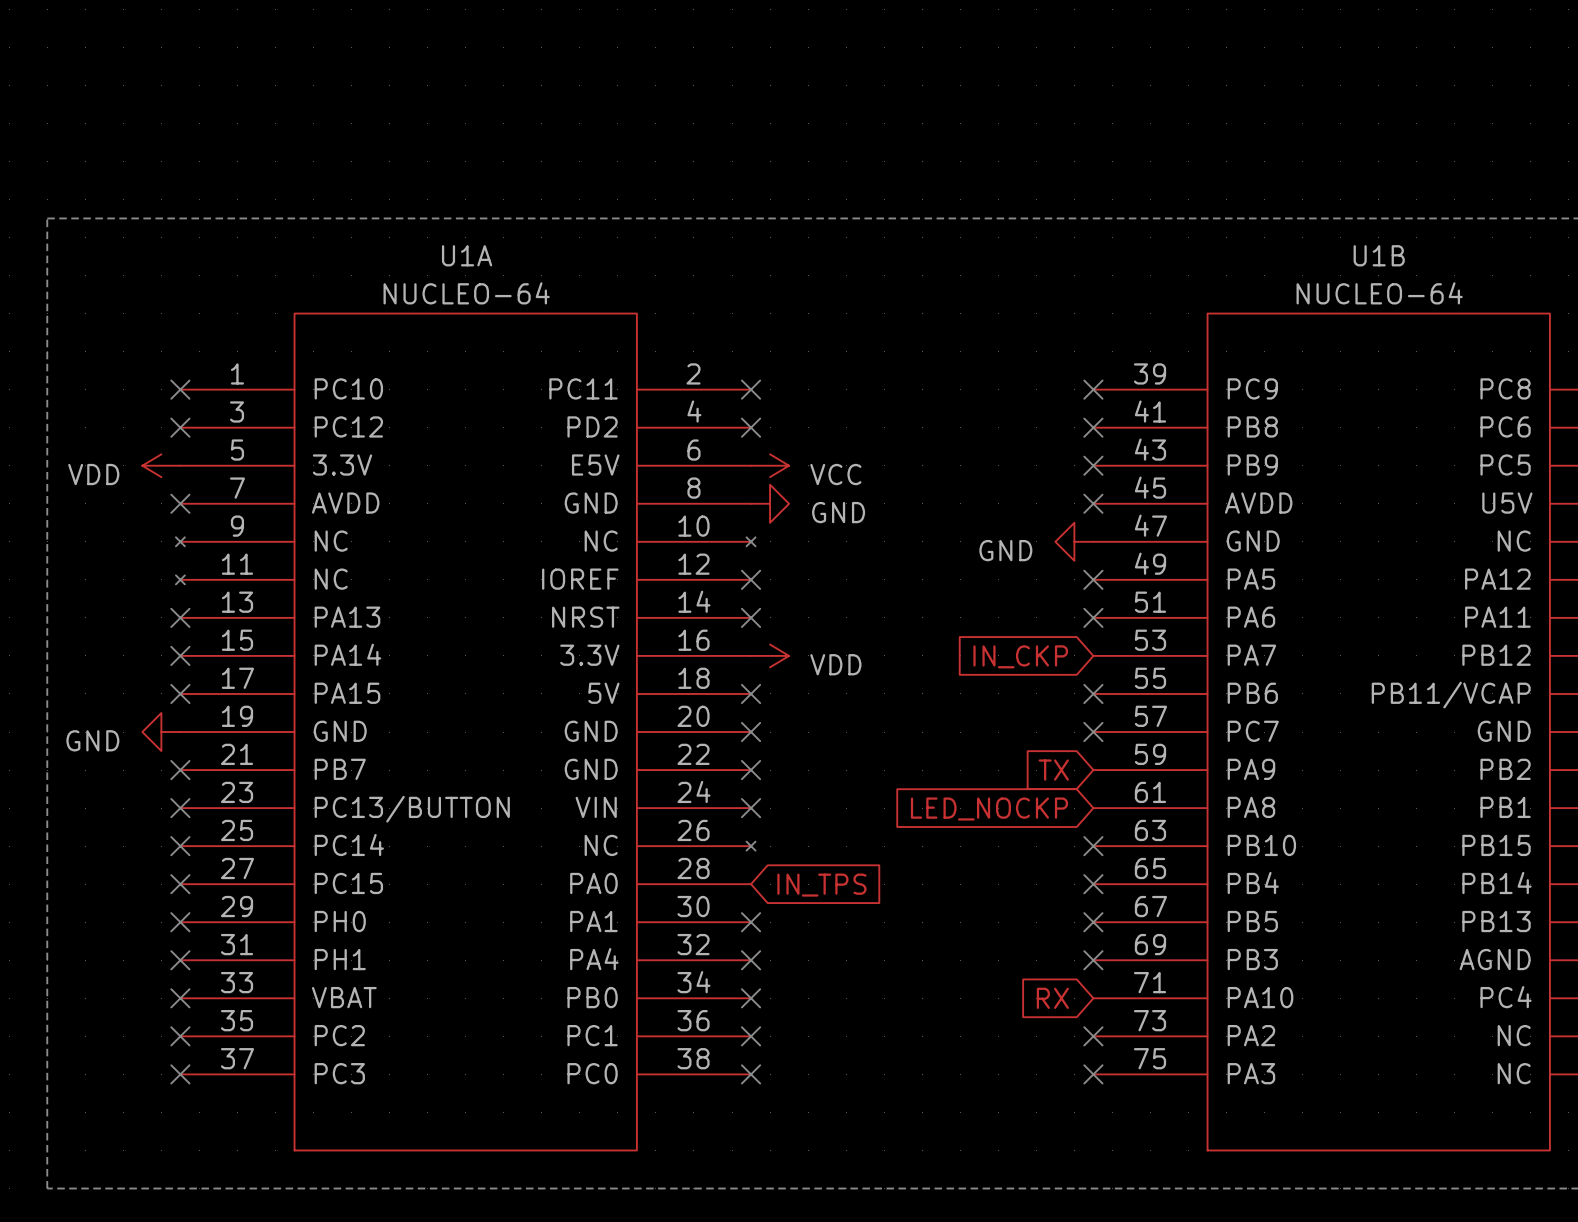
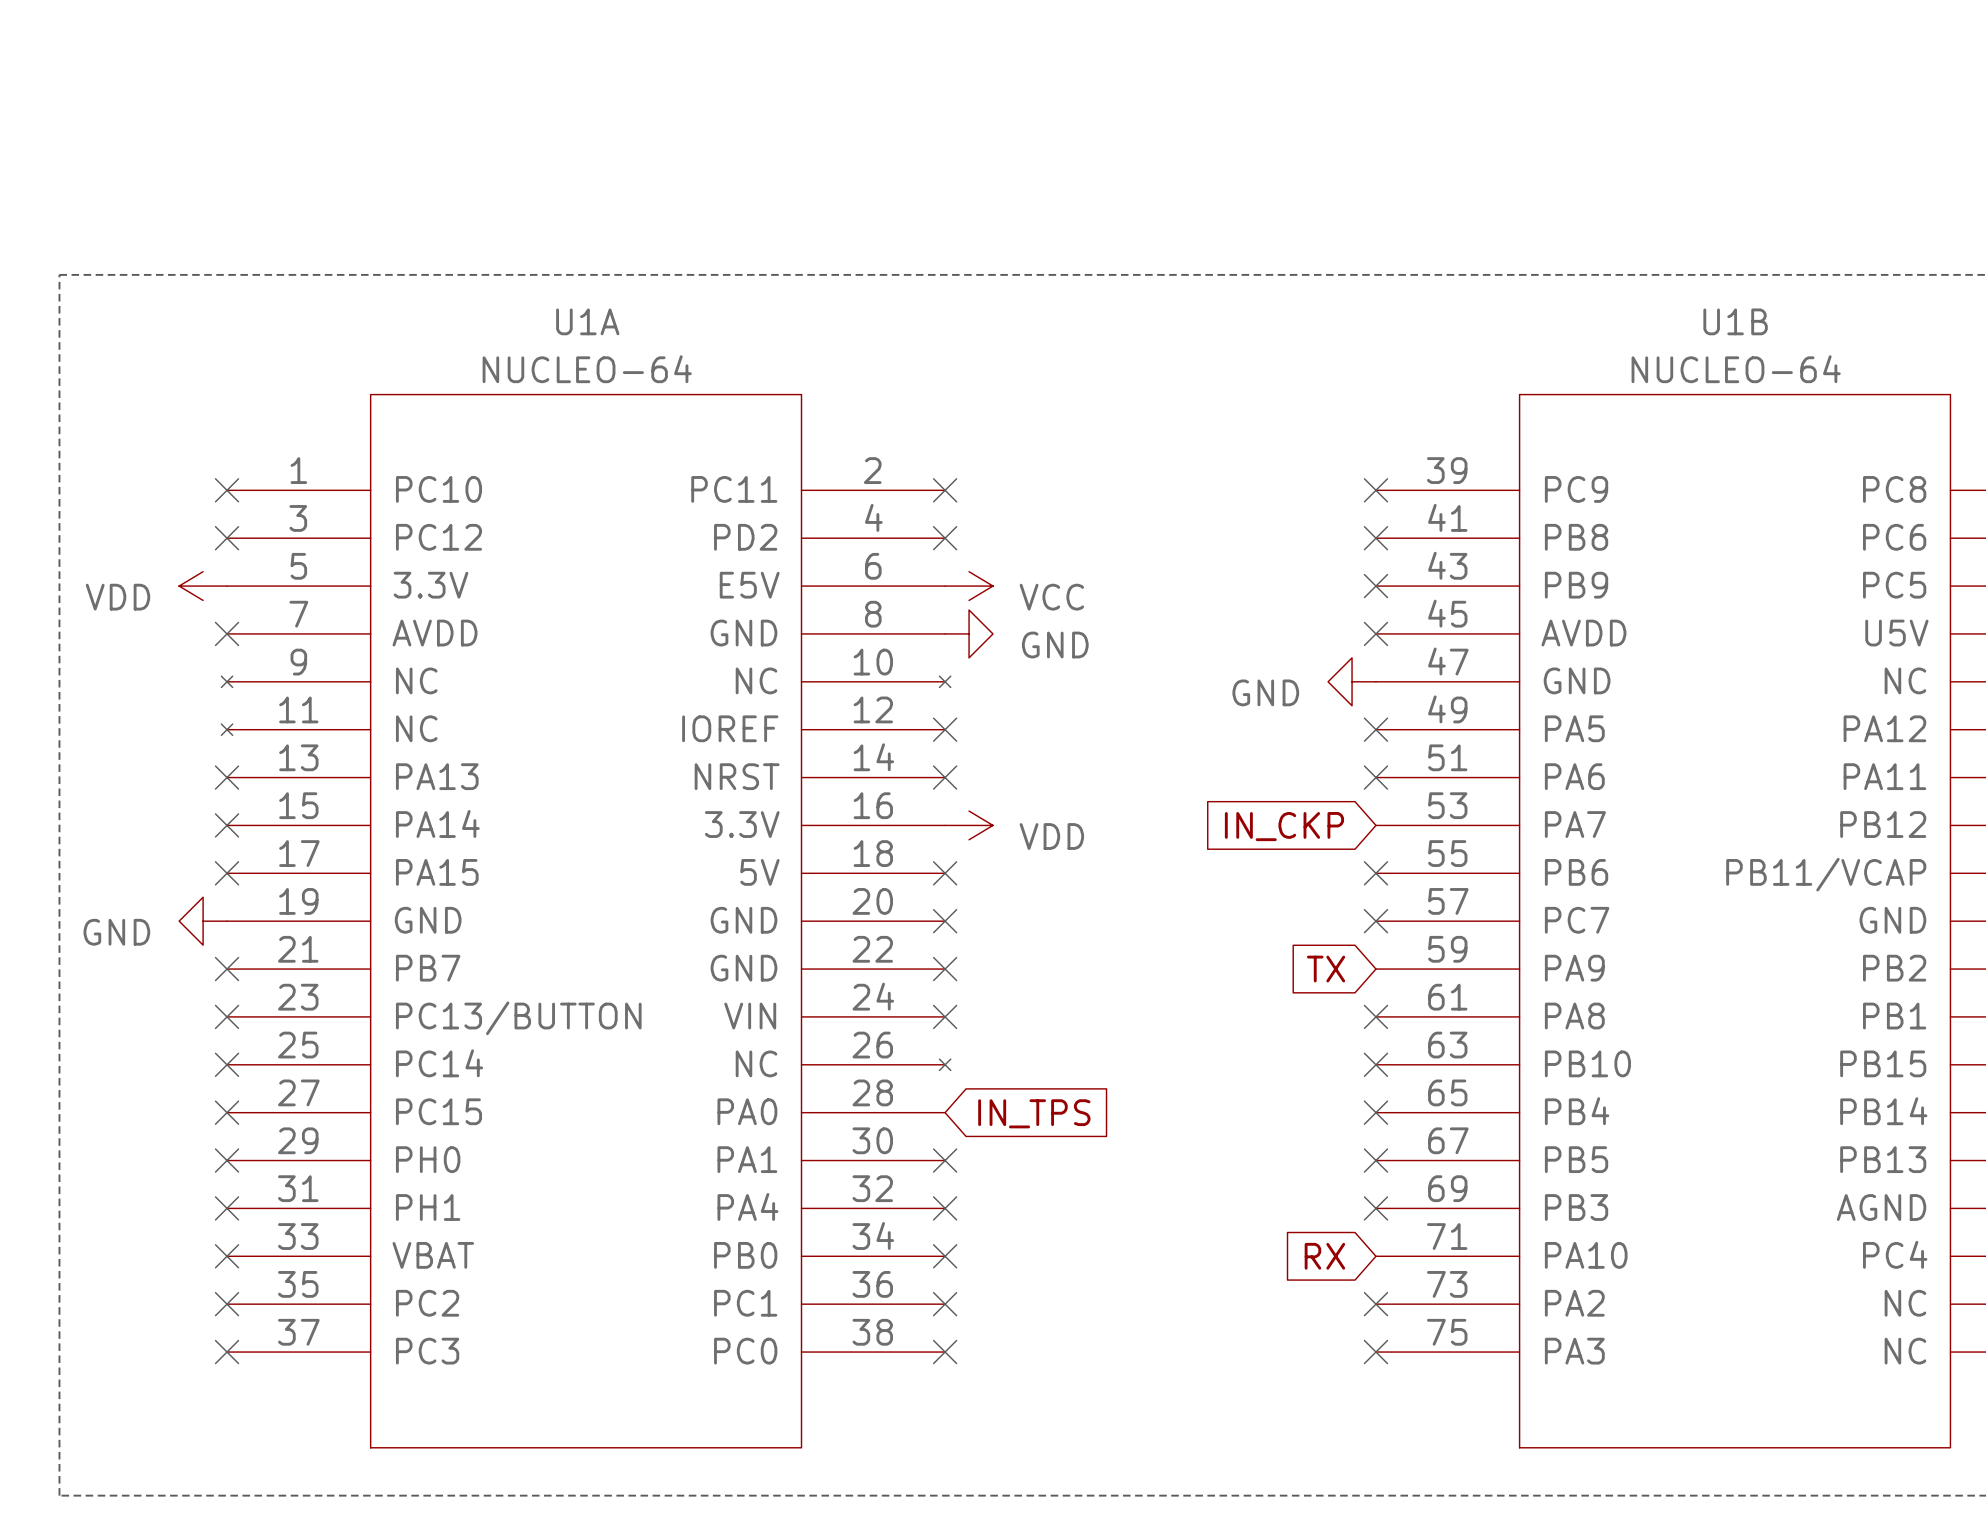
no-connect mark: none -> (1375, 1016)
global label: LED_NOCKP (989, 809) -> none

